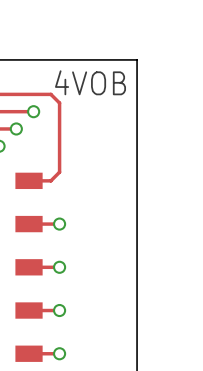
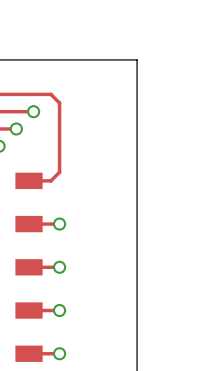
text: 4VOB (90, 82) -> none

